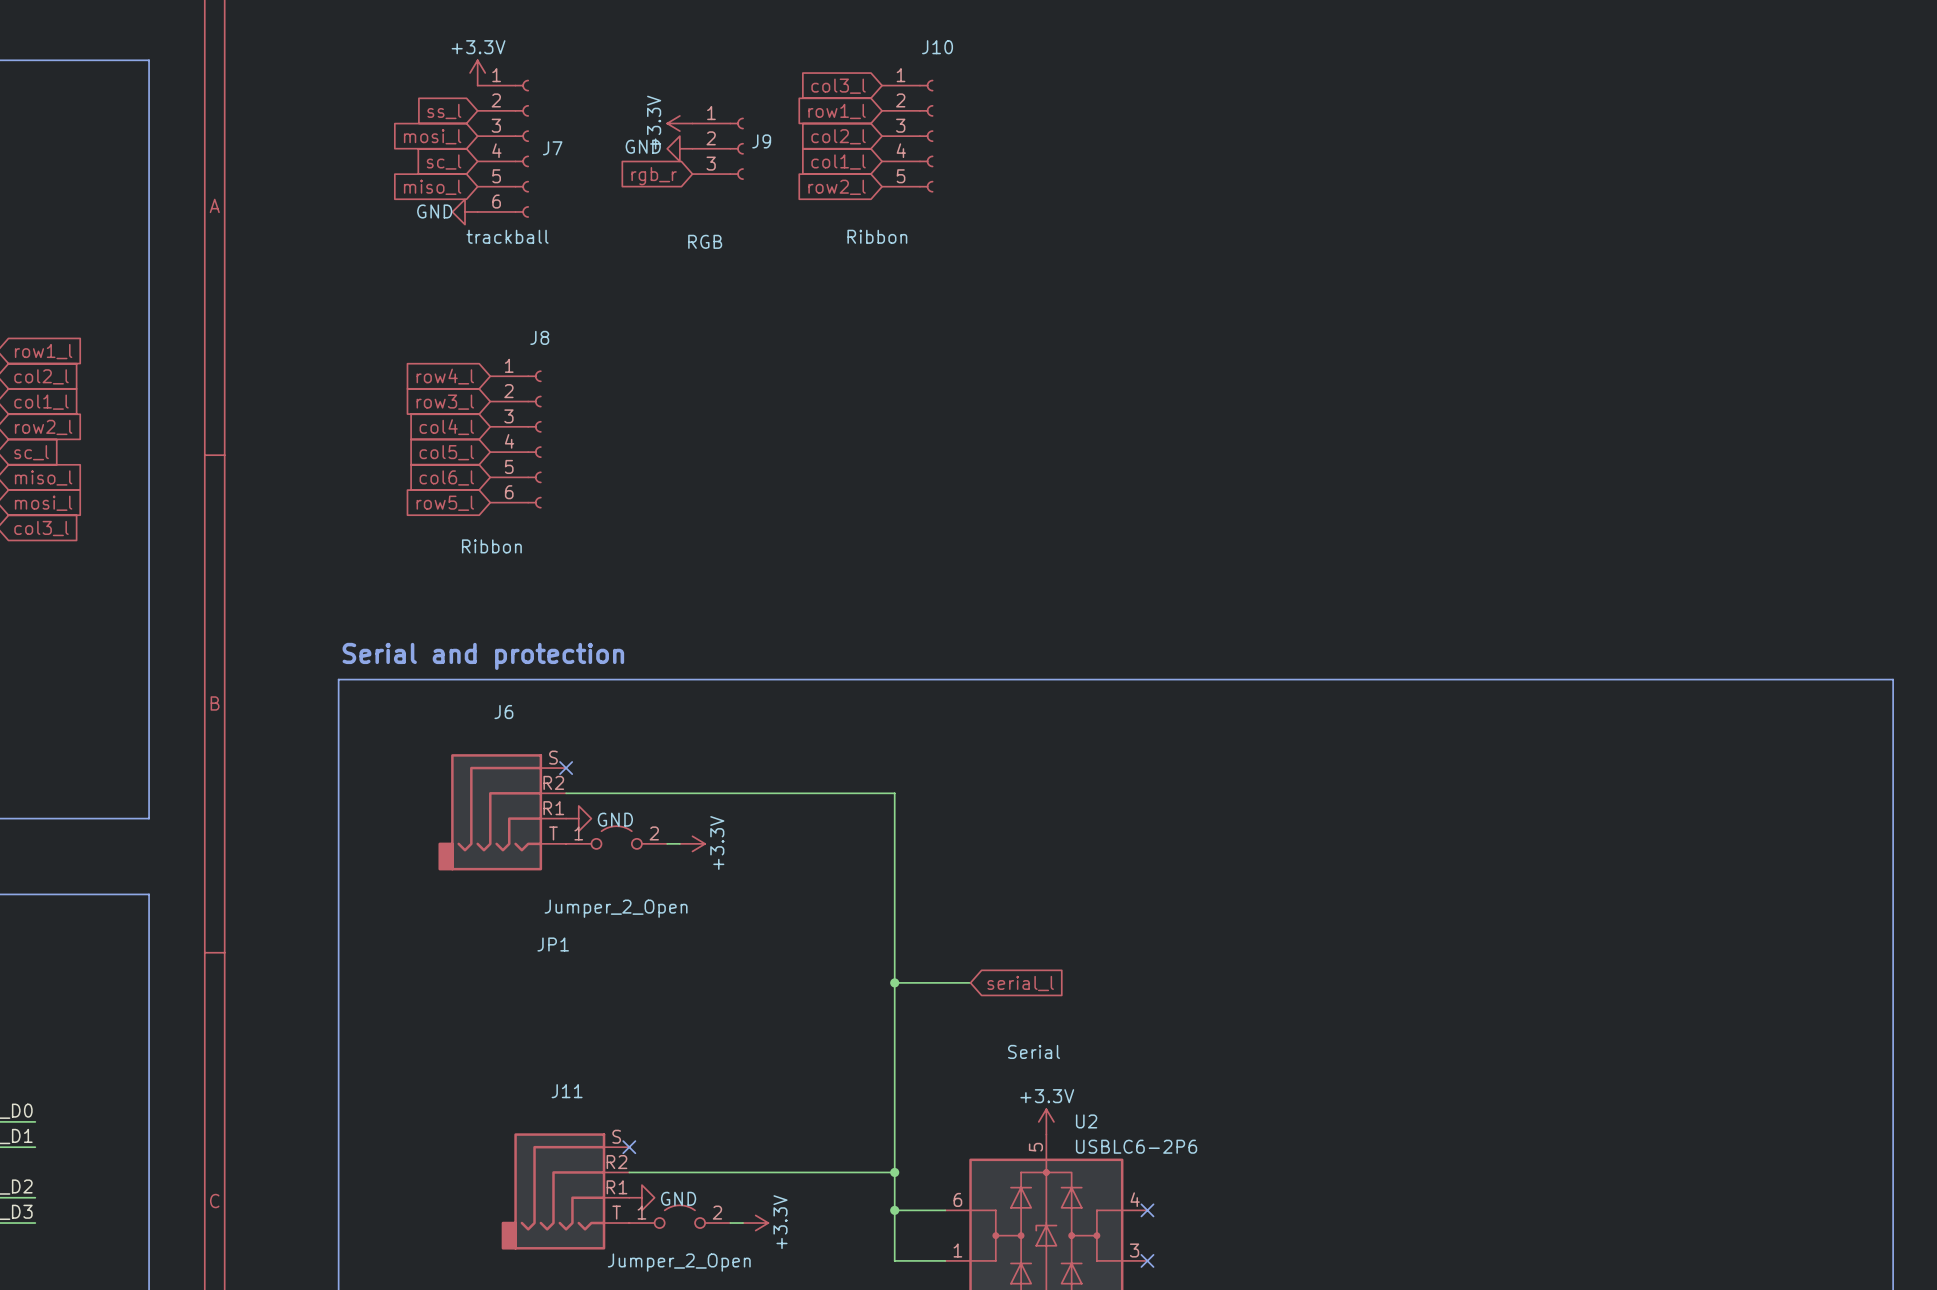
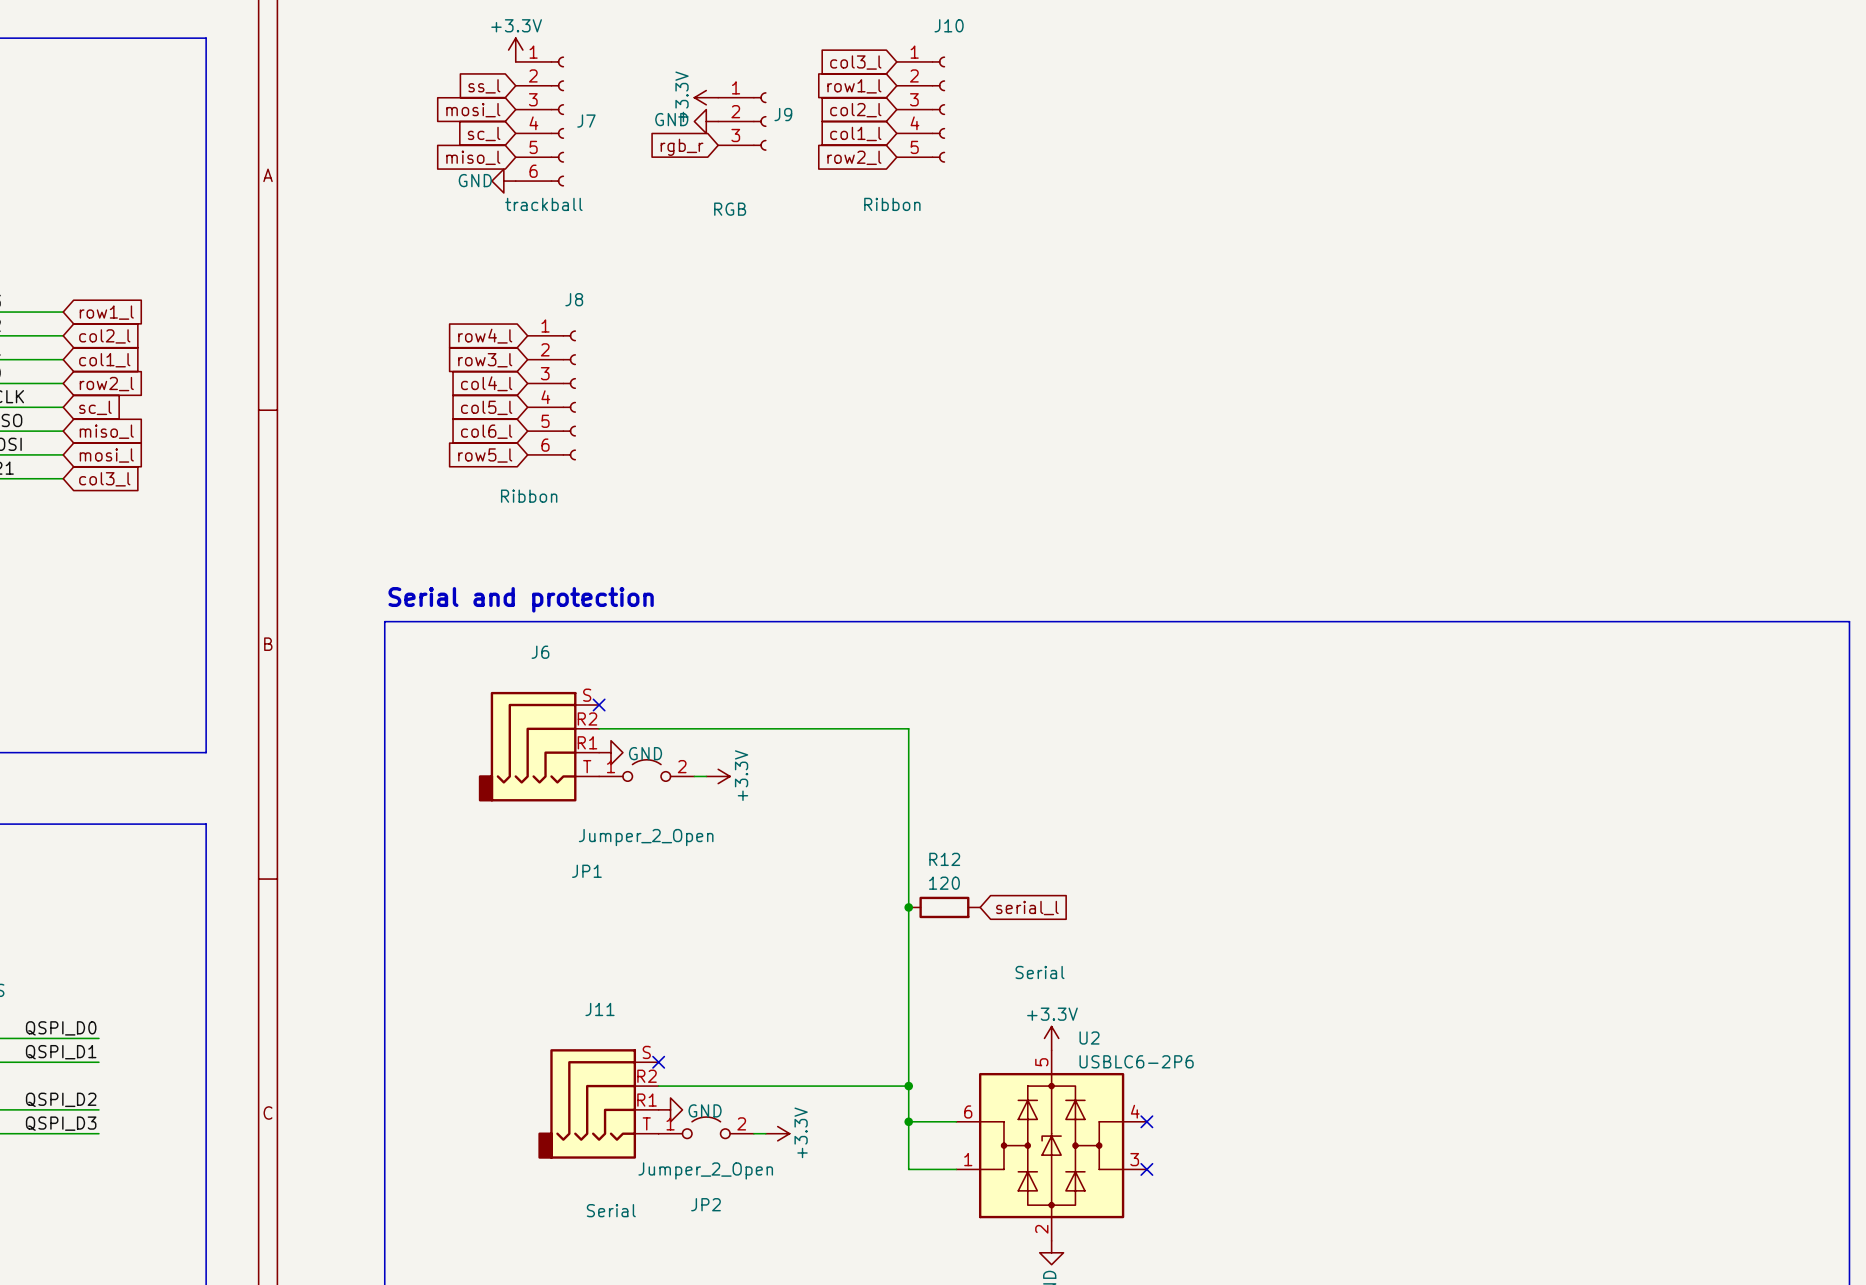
wire: (894, 982) (970, 982) -> none
R12: none -> 120 (944, 907)

